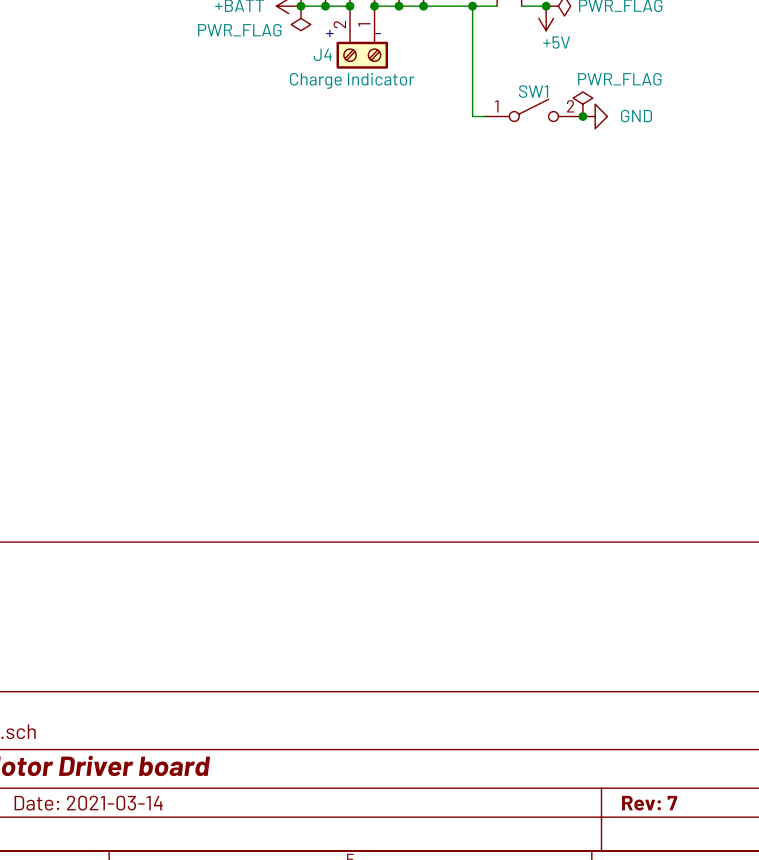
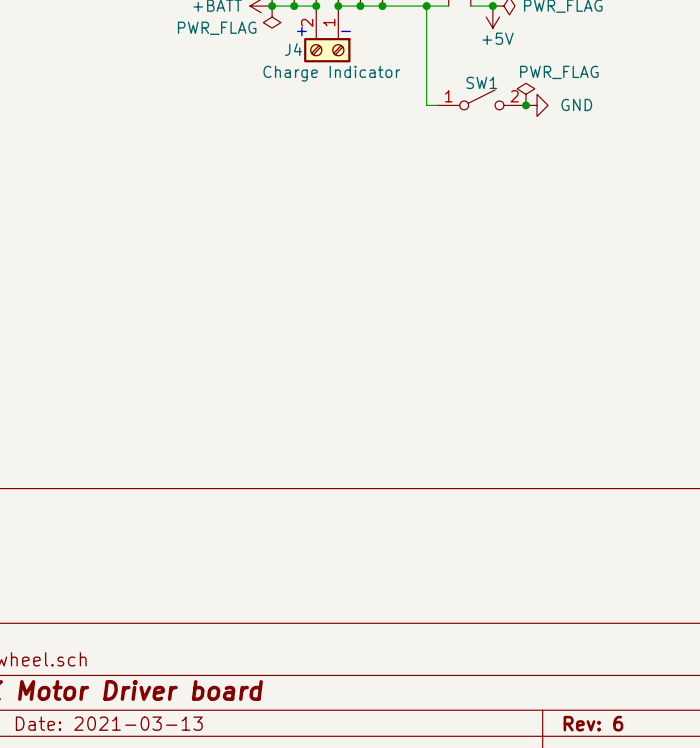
title block: Date: 2021-03-14 (88, 803) -> Date: 2021-03-13 (109, 723)
title block: Rev: 7 (649, 803) -> Rev: 6 (593, 723)

